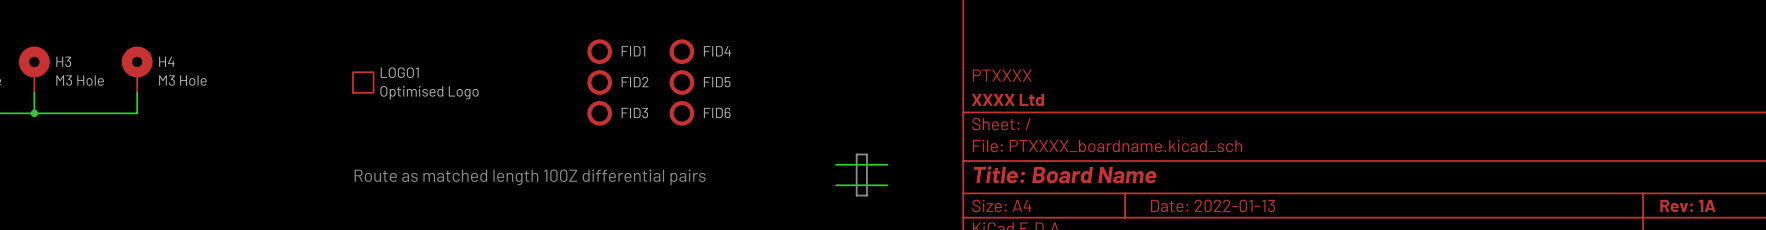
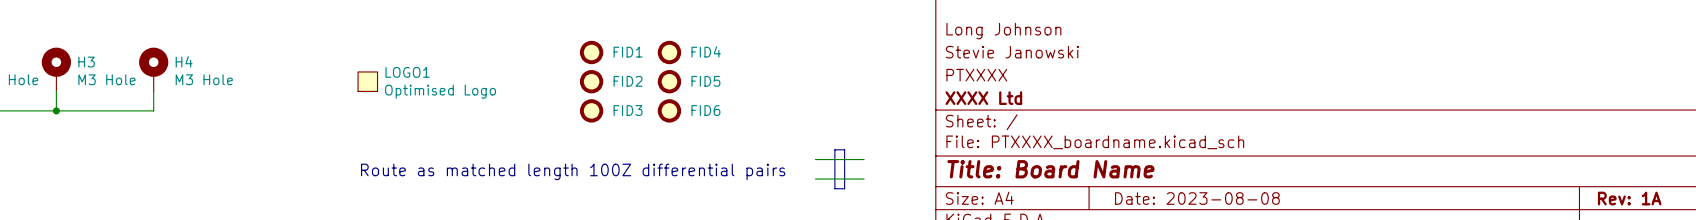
title block: none -> Long Johnson (1003, 31)
title block: none -> Stevie Janowski (1012, 52)
title block: Date: 2022-01-13 (1213, 205) -> Date: 2023-08-08 (1197, 198)

